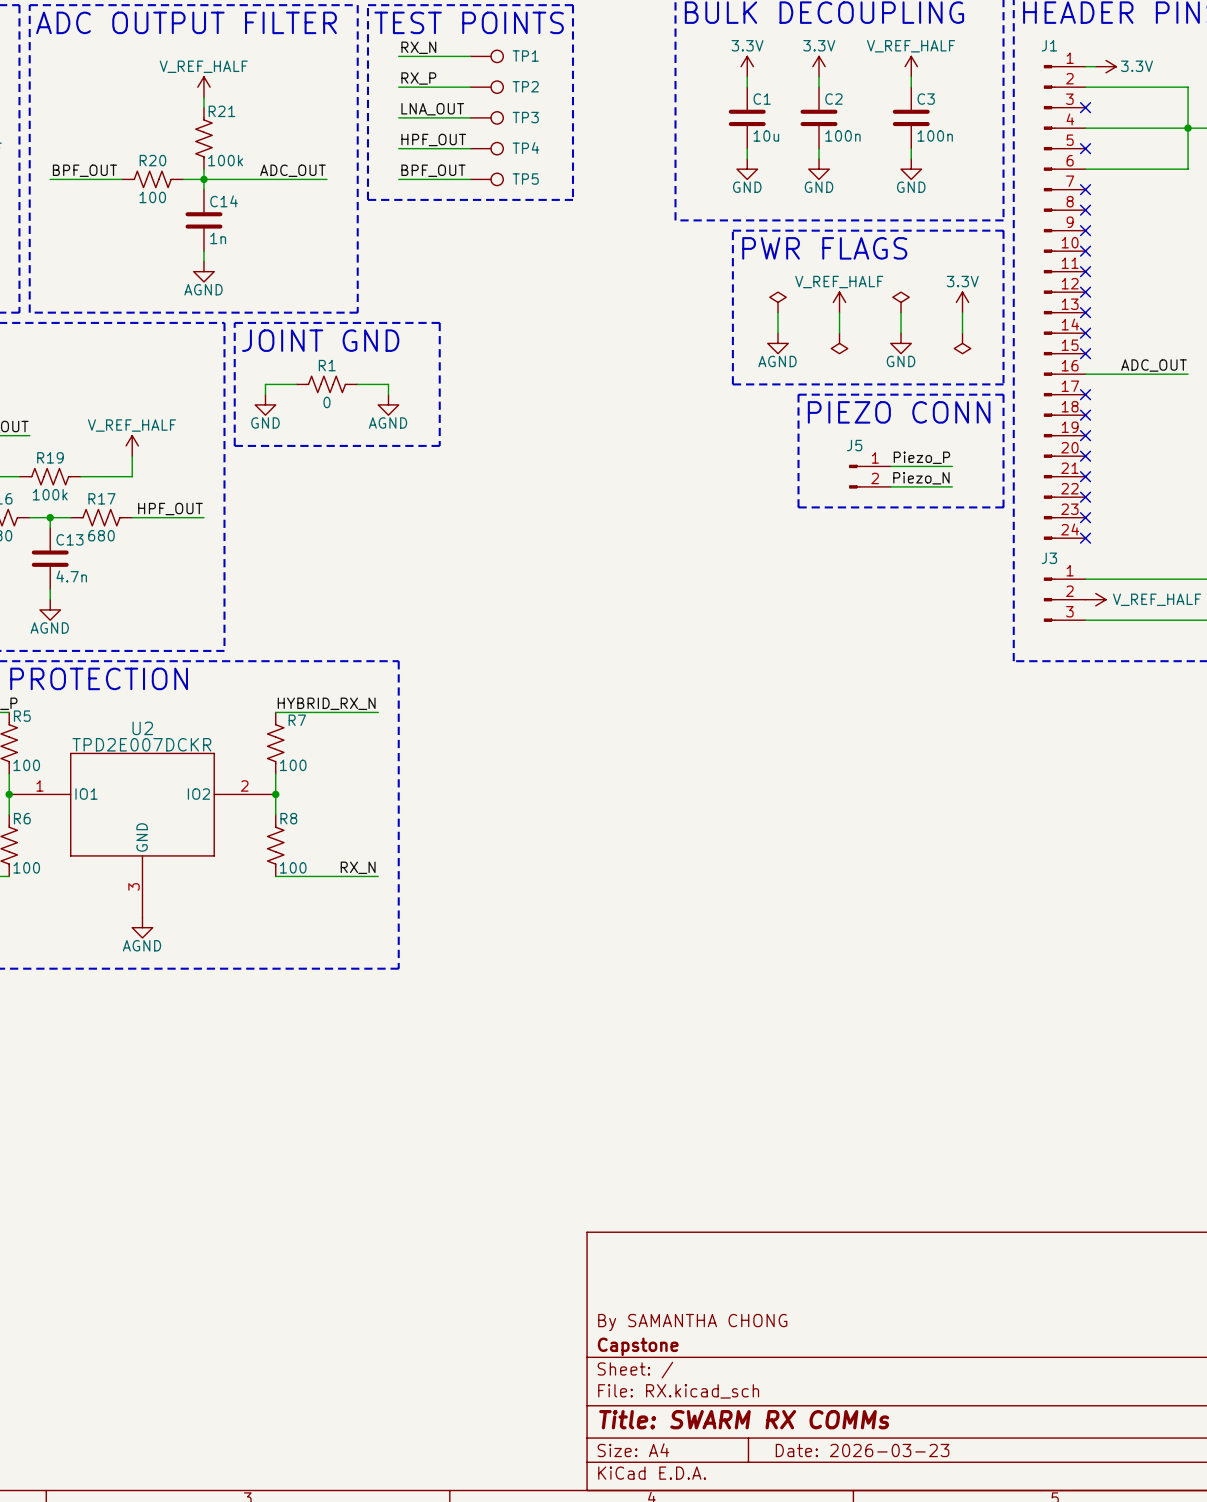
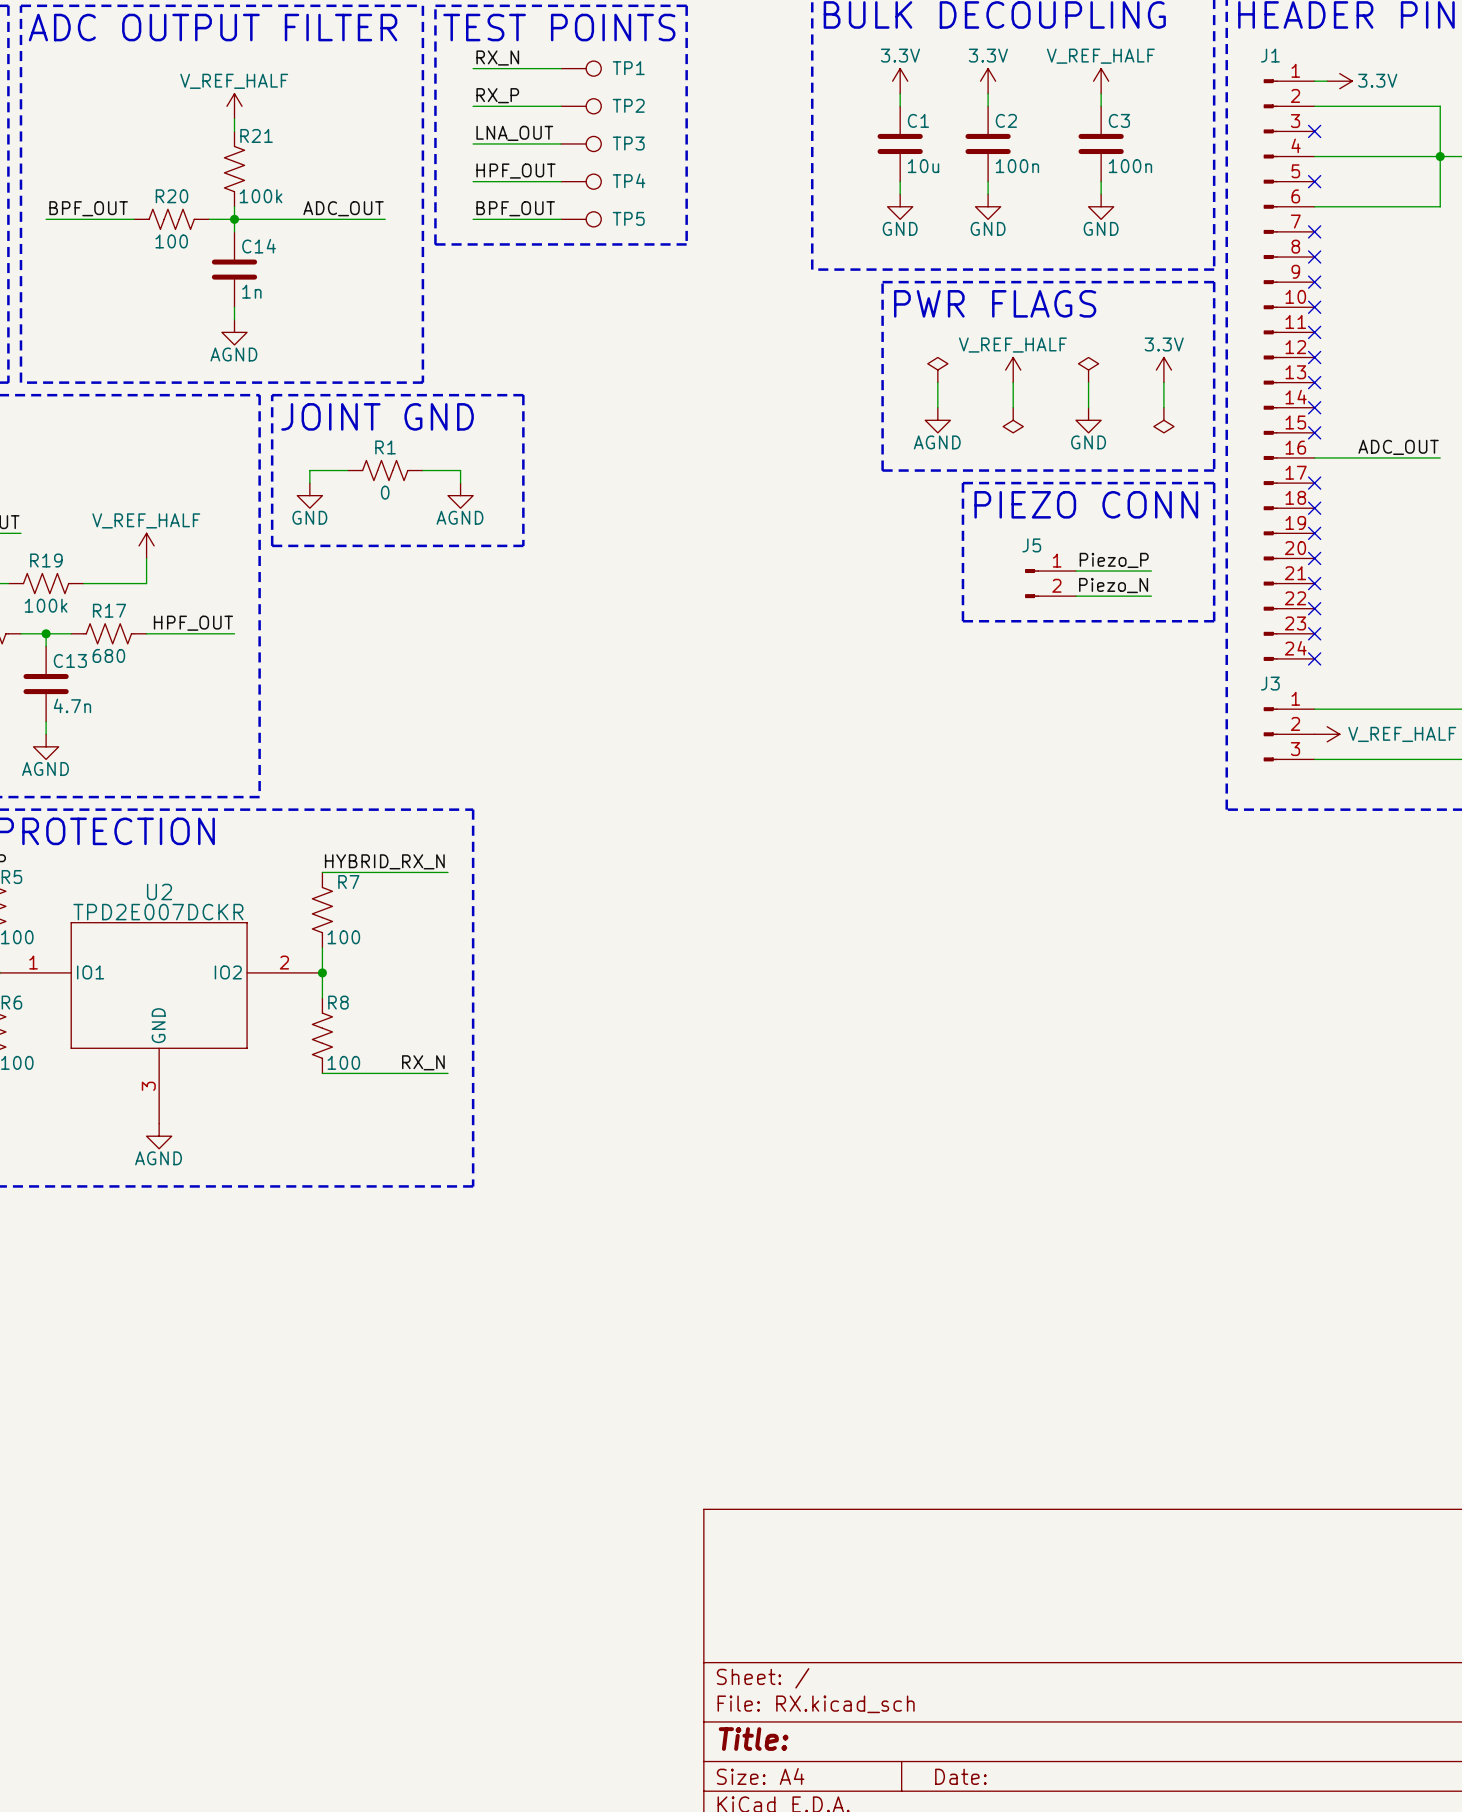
title block: By SAMANTHA CHONG (692, 1322) -> none
title block: Capstone (638, 1346) -> none
title block: Title: SWARM RX COMMs (744, 1419) -> Title: (753, 1739)
title block: Date: 2026-03-23 (862, 1450) -> Date: (960, 1776)

